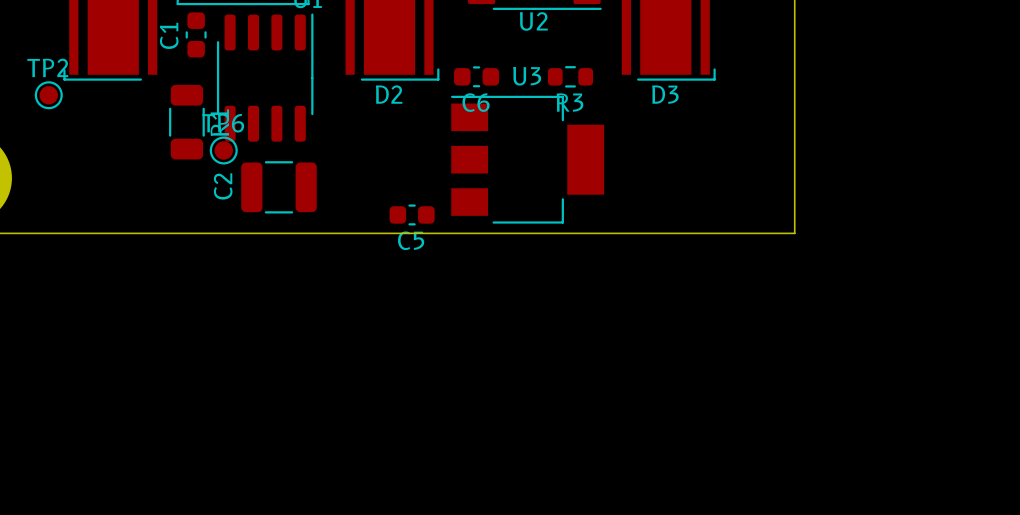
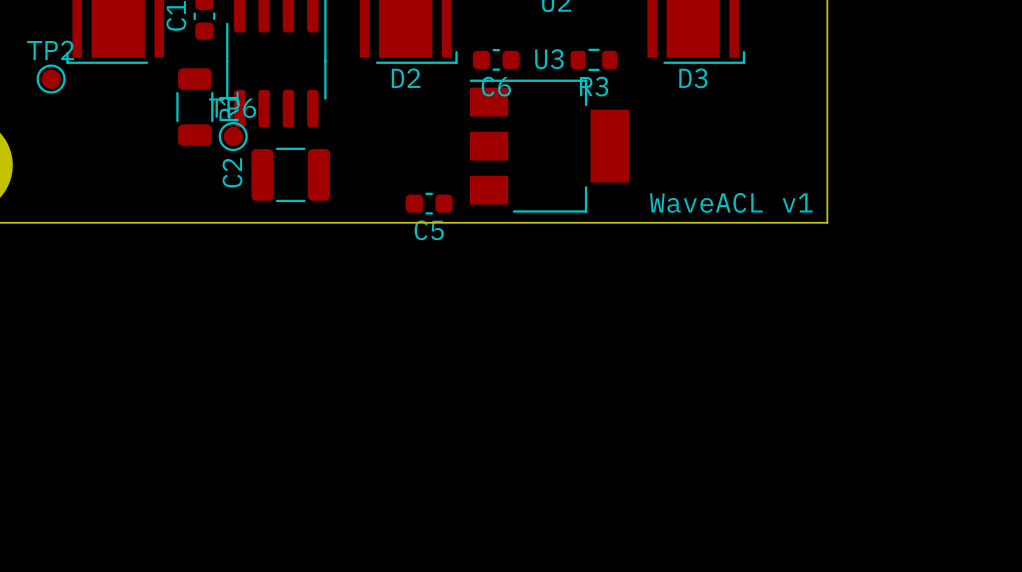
text: none -> WaveACL v1 (731, 202)

